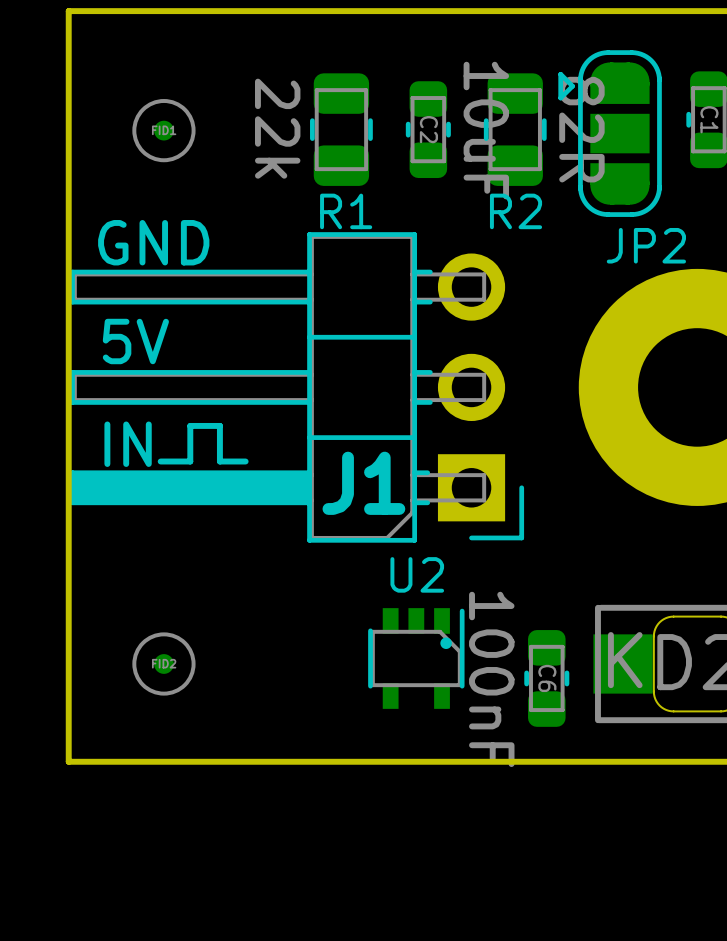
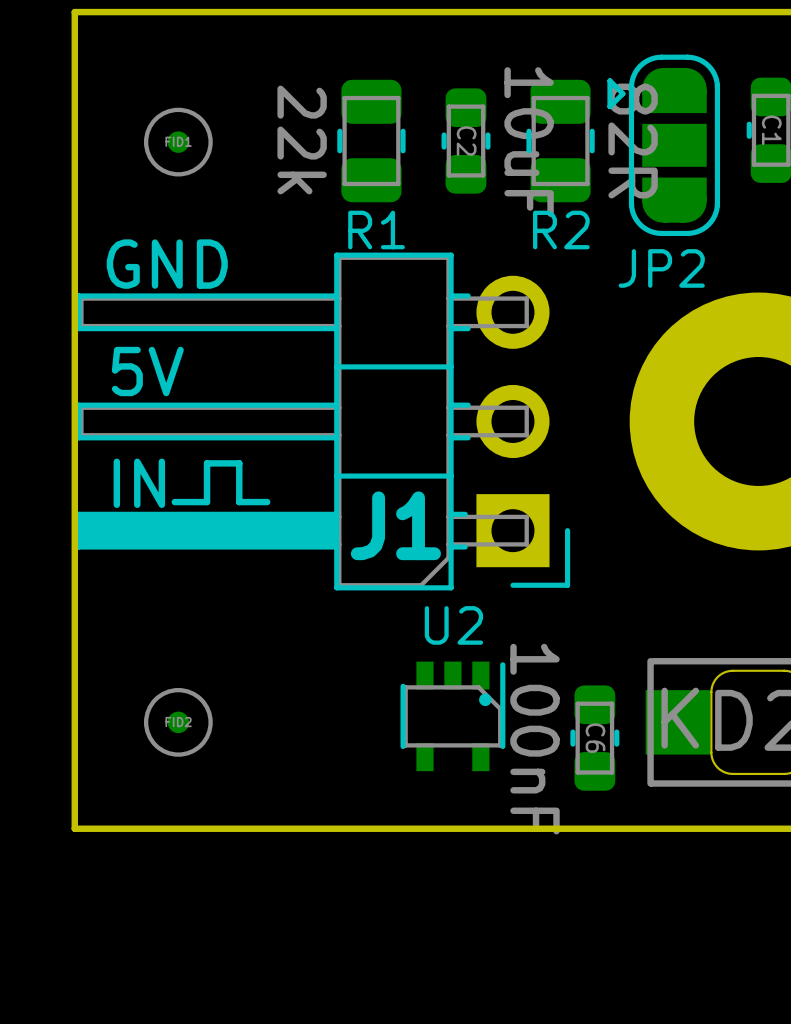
JP2 name position: JP2 (646, 245) -> JP2 (661, 268)

